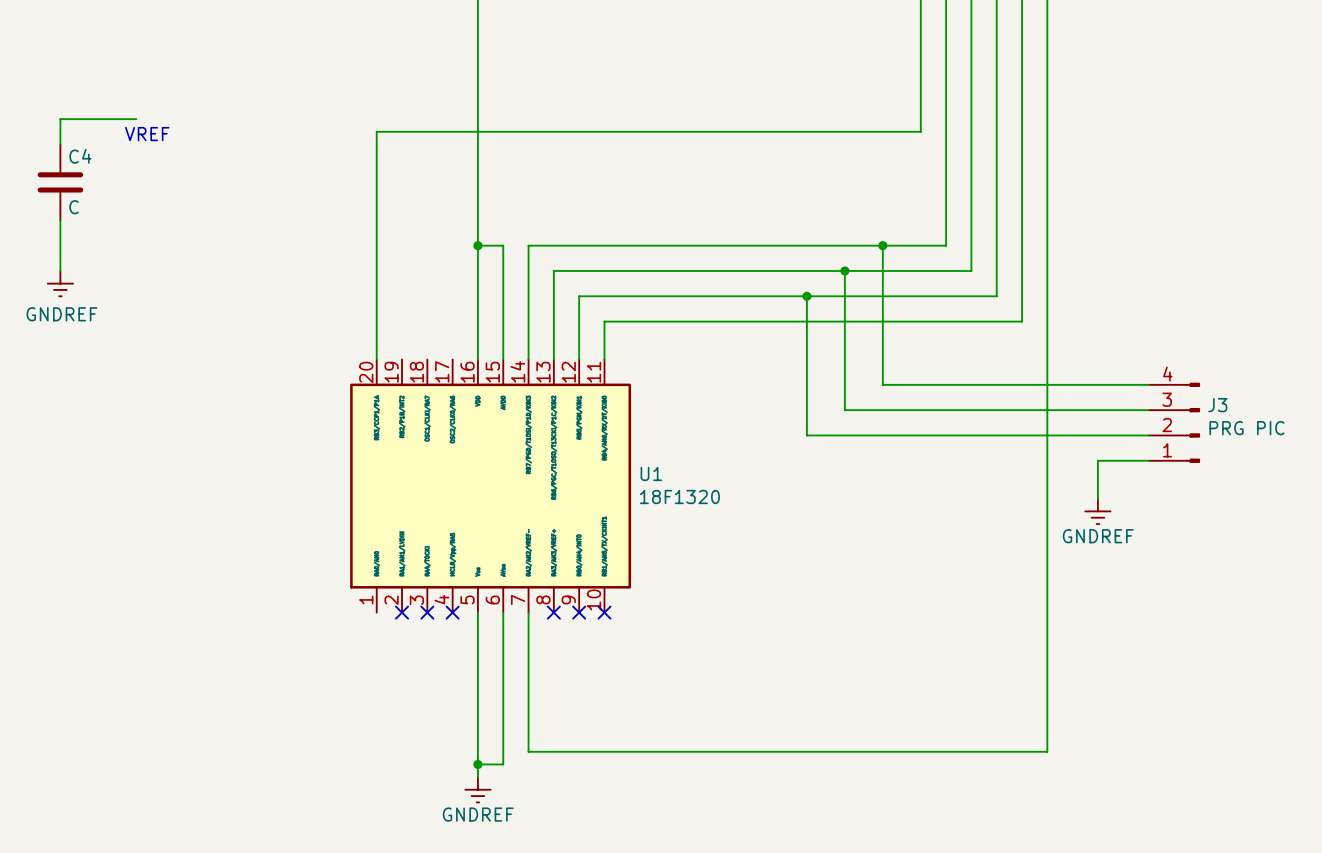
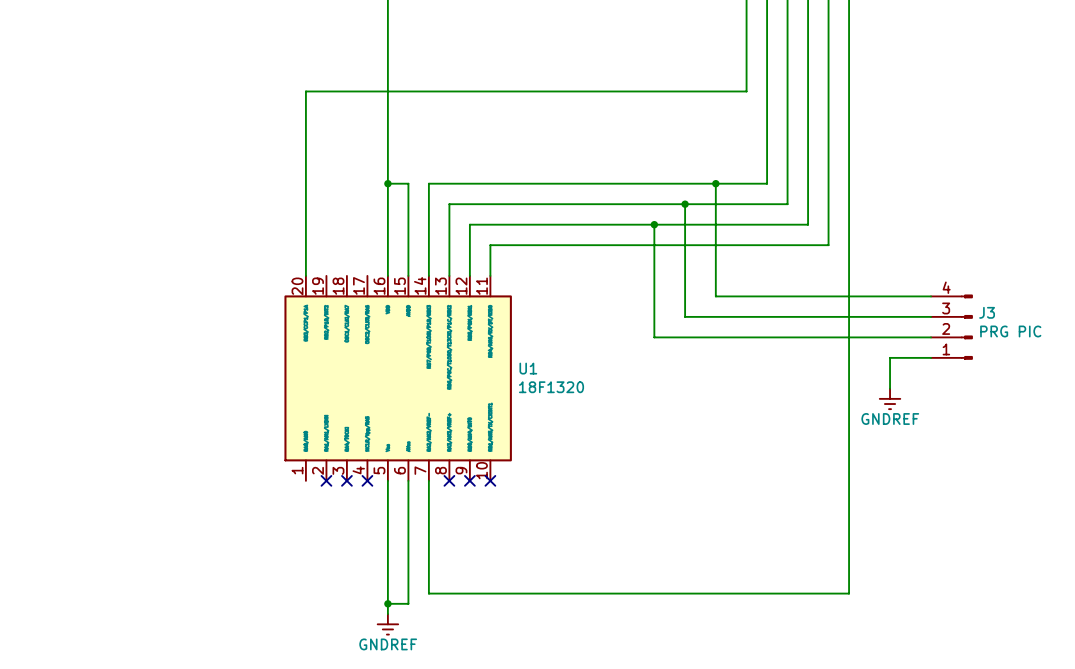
wire: (136, 119) (60, 119) (60, 144) -> none
text: VREF (147, 134) -> none
C4: C (60, 182) -> none
wire: (60, 220) (60, 270) -> none
power symbol: GNDREF (60, 283) -> none

